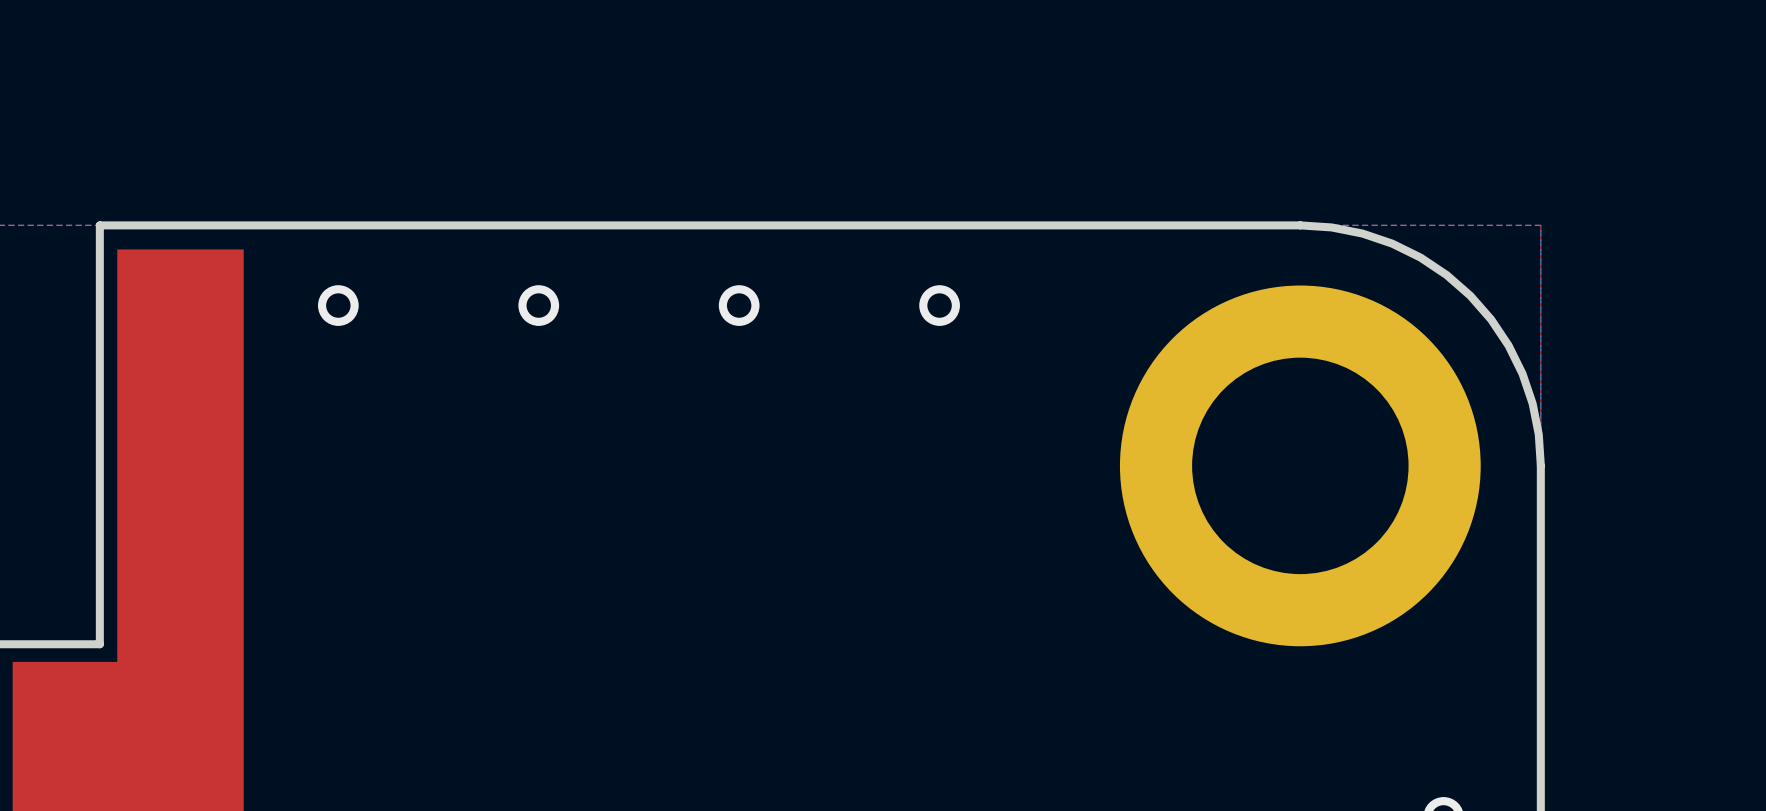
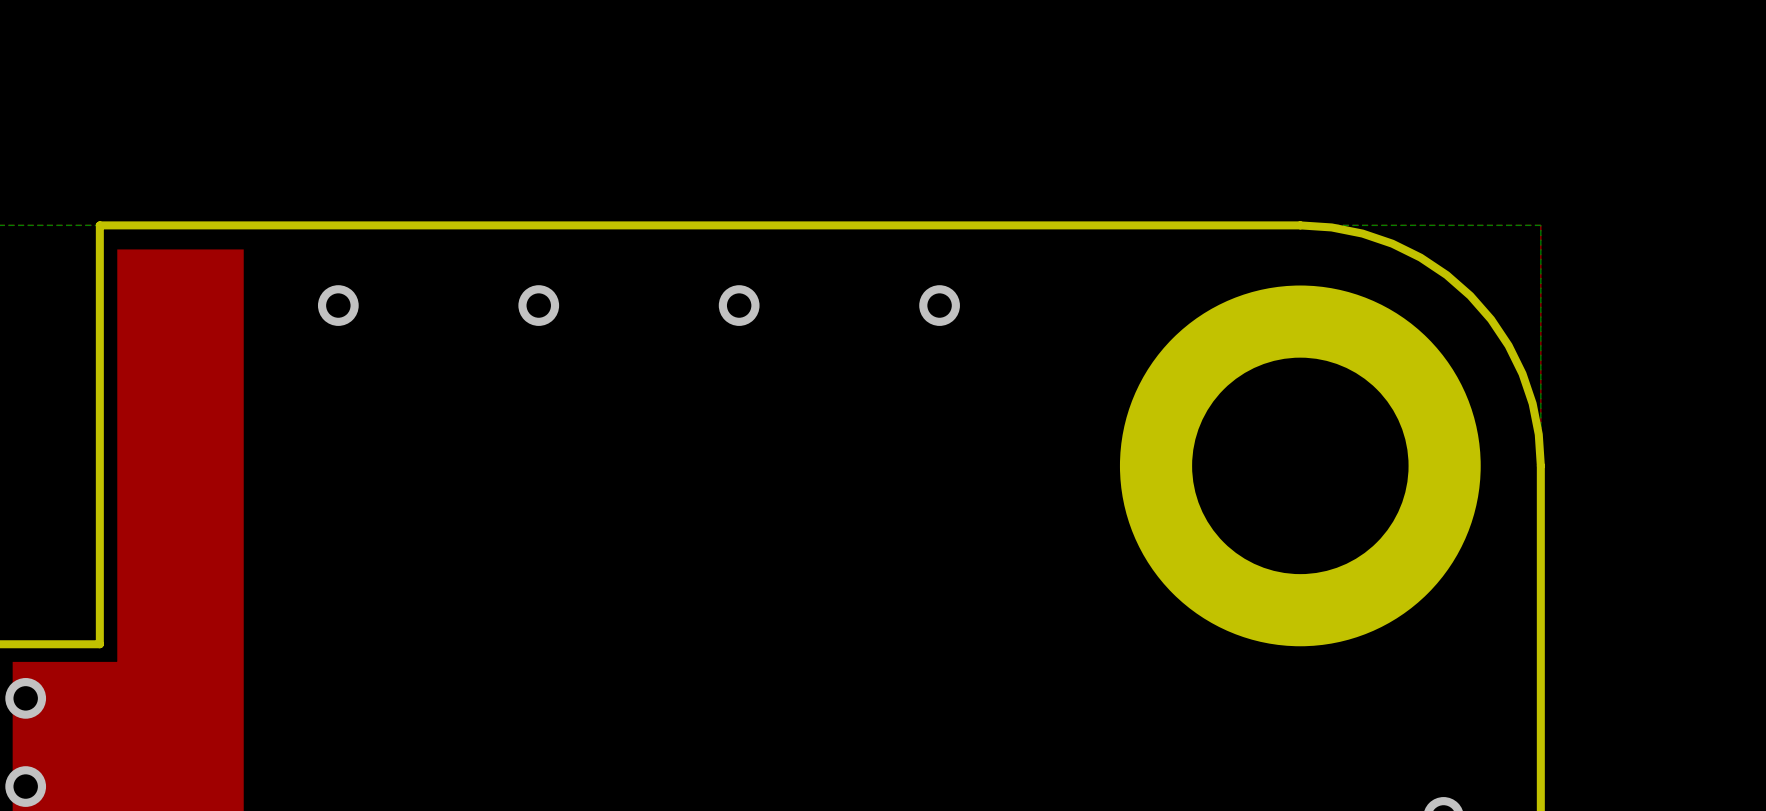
via: none -> (25, 698)
via: none -> (25, 786)

